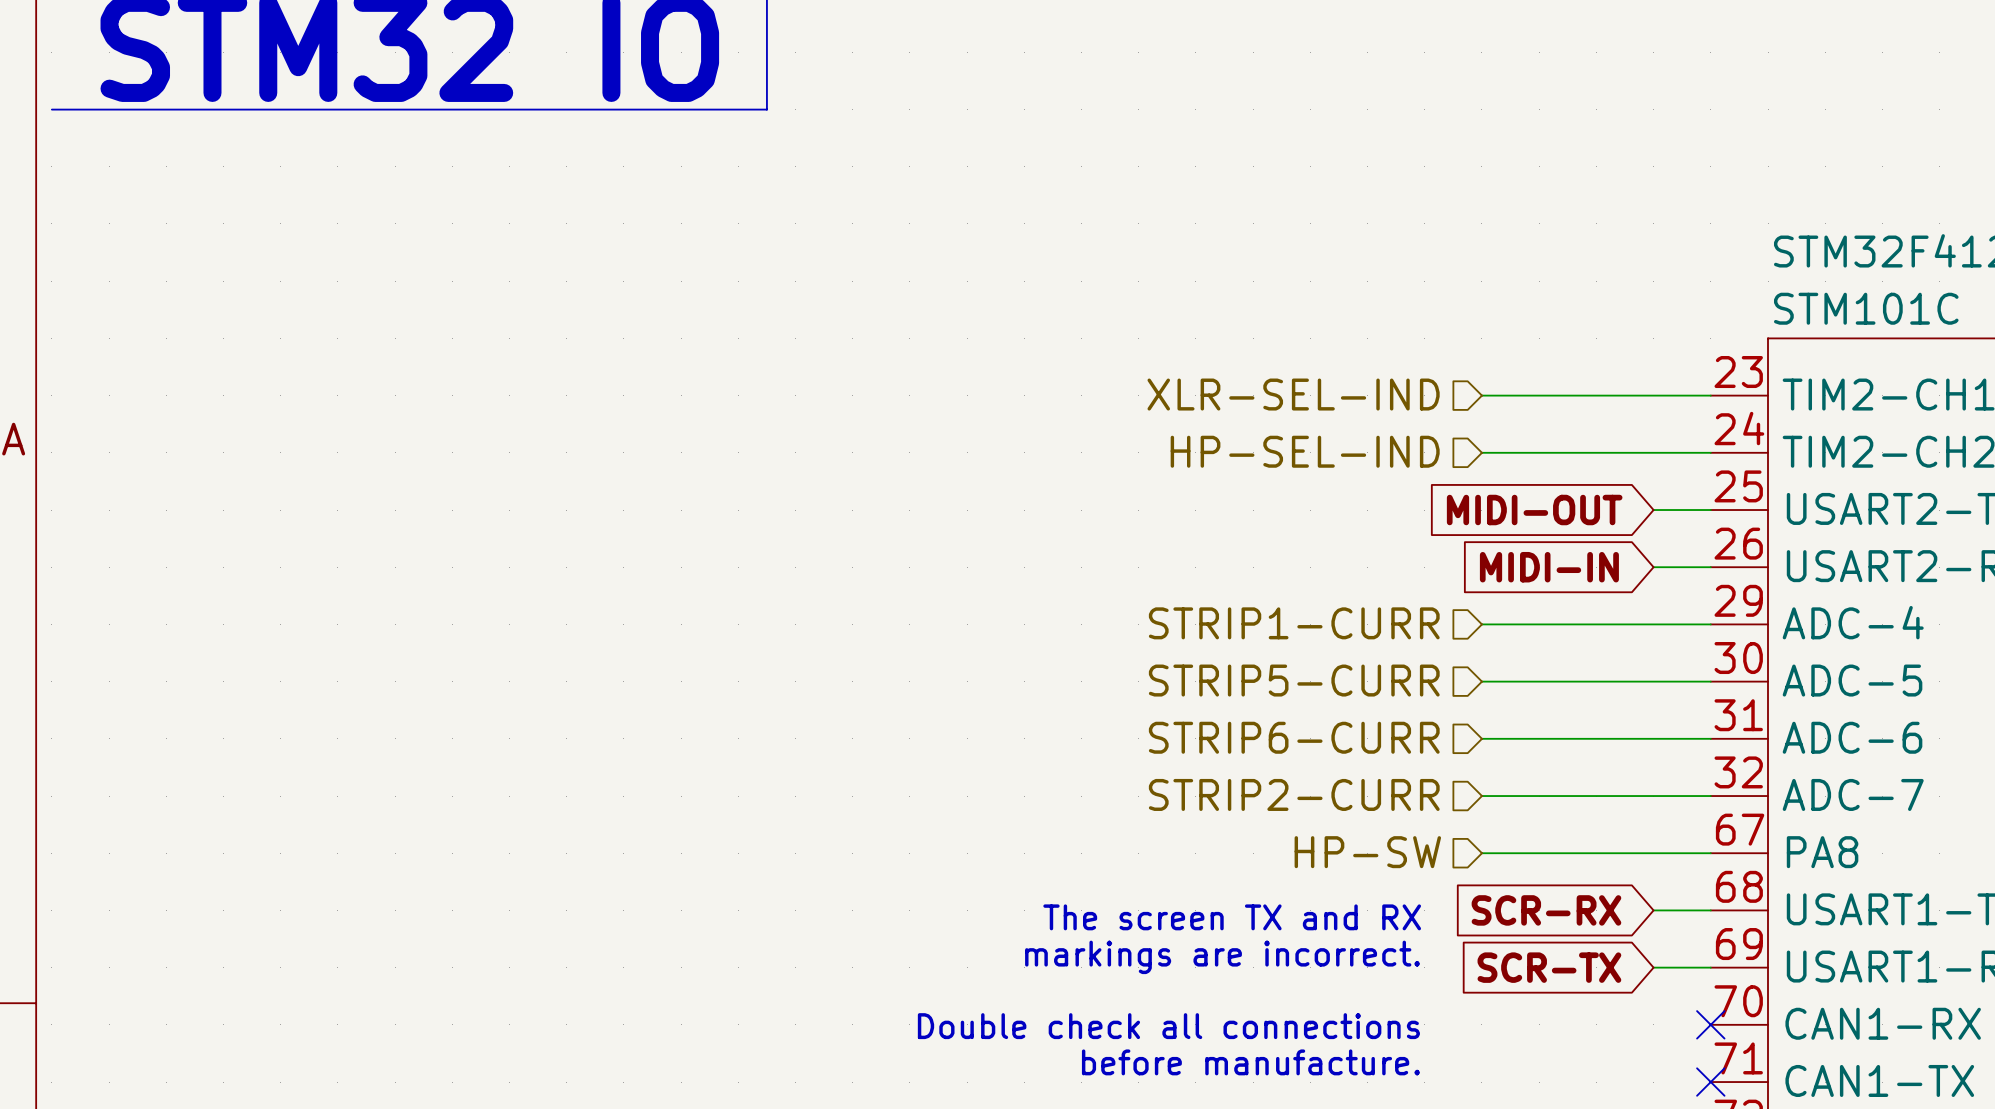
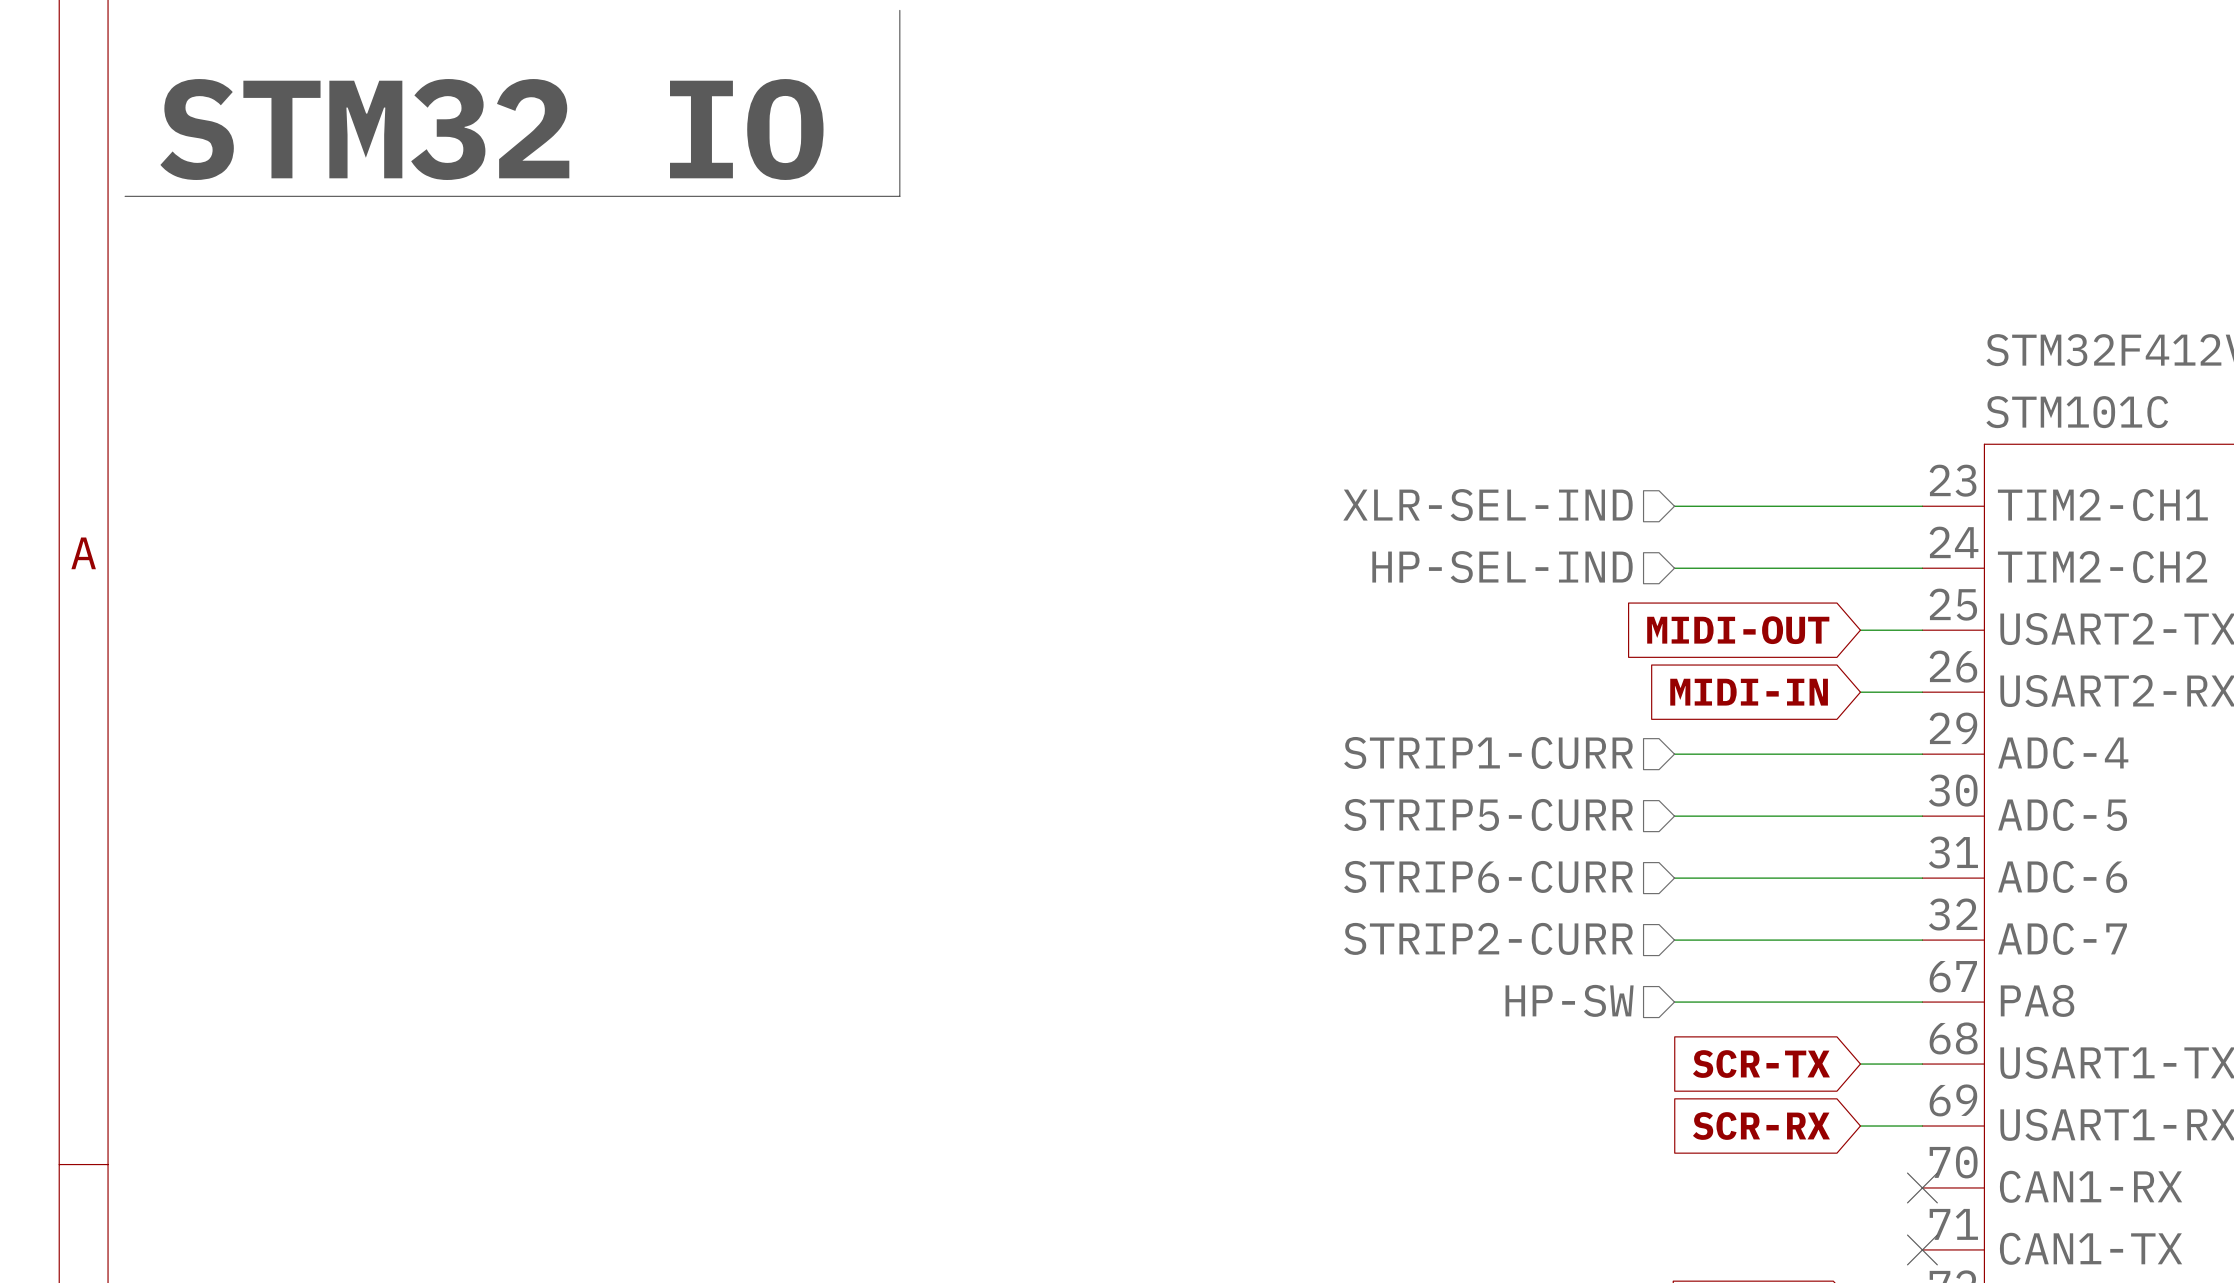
global label: SCR-RX (1546, 910) -> SCR-TX (1761, 1064)
text: The screen TX and RX (1232, 917) -> none
text: markings are incorrect. (1222, 957) -> none
global label: SCR-TX (1549, 967) -> SCR-RX (1761, 1126)
text: Double check all connections (1168, 1026) -> none
text: before manufacture. (1250, 1062) -> none

